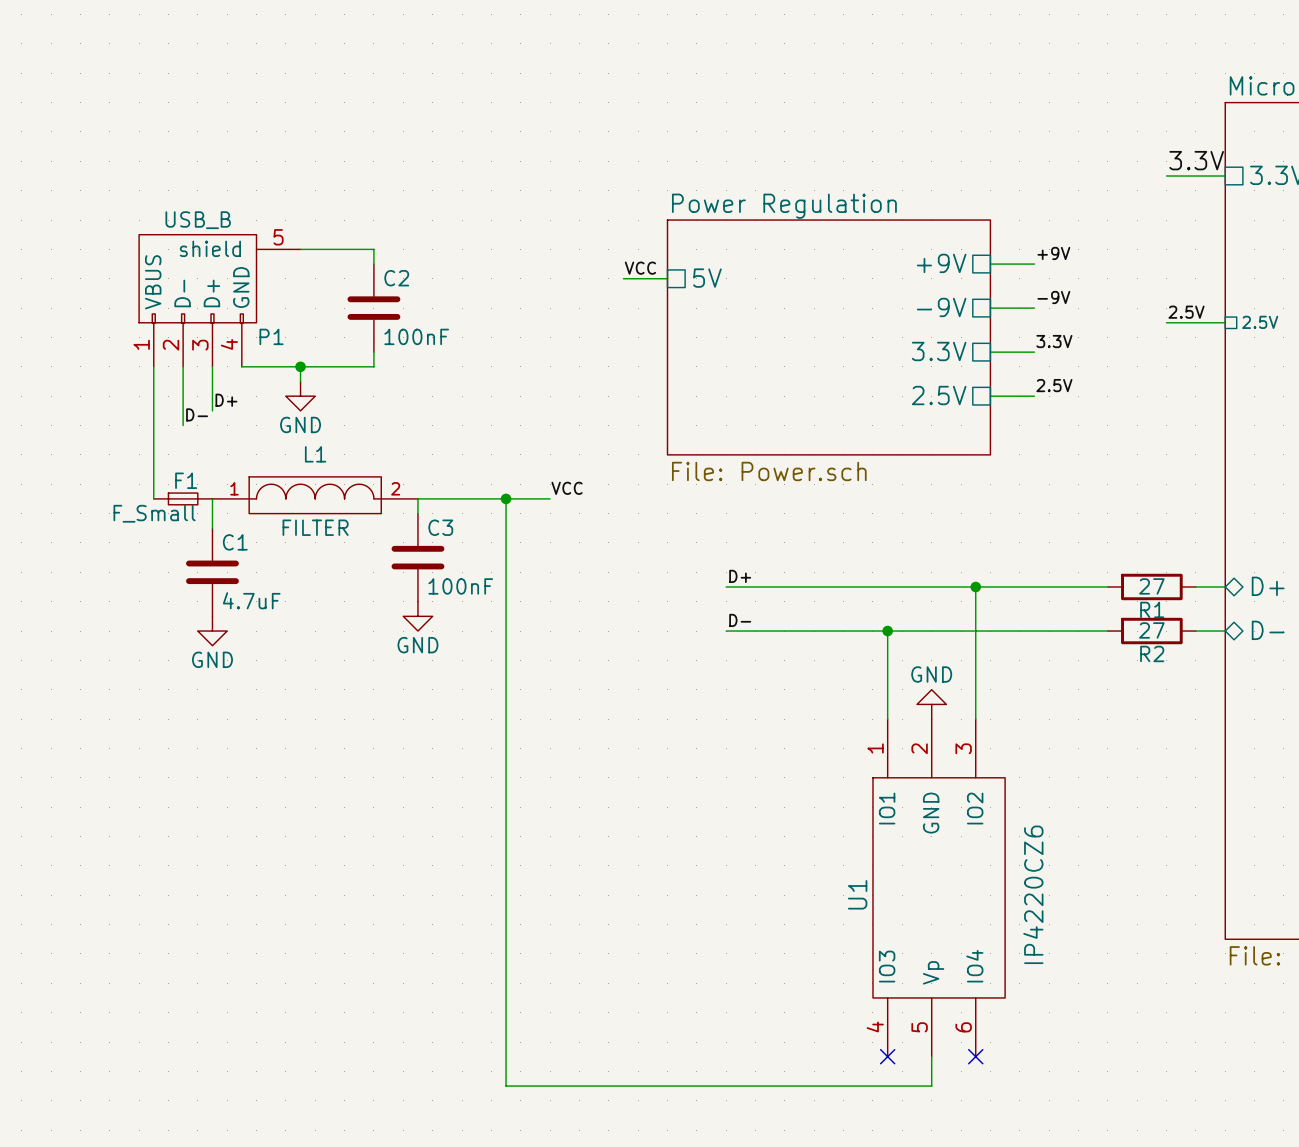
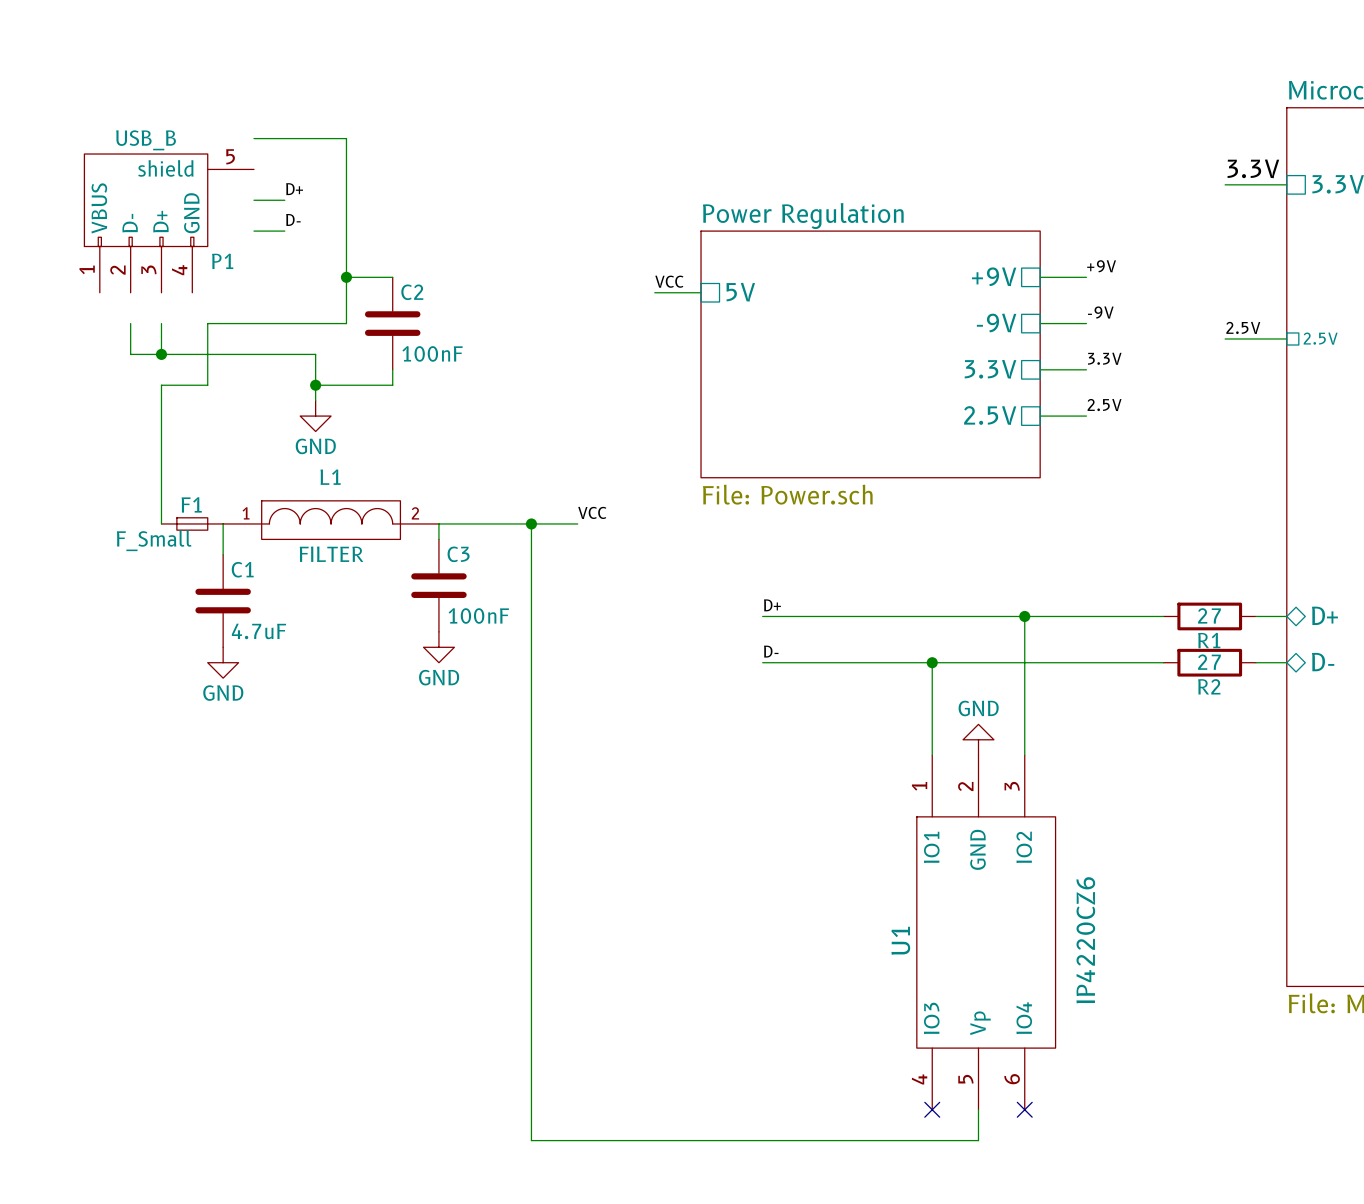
wire: none -> (253, 138) (346, 138) (346, 323) (207, 323) (207, 385) (161, 385)
wire: none -> (253, 200) (284, 200)
wire: none -> (253, 231) (284, 231)
wire: (300, 249) (373, 249) (373, 264) -> (346, 277) (392, 277)
junction: none -> (346, 277)
P1 position: (219, 300) -> (169, 223)
junction: none -> (161, 354)
wire: (183, 366) (183, 425) -> none
wire: (212, 366) (212, 410) -> none
wire: (241, 366) (300, 366) -> (130, 323) (130, 354) (315, 354) (315, 385)
label position: D+ (226, 400) -> D+ (294, 189)
label position: D- (197, 414) -> D- (293, 219)

